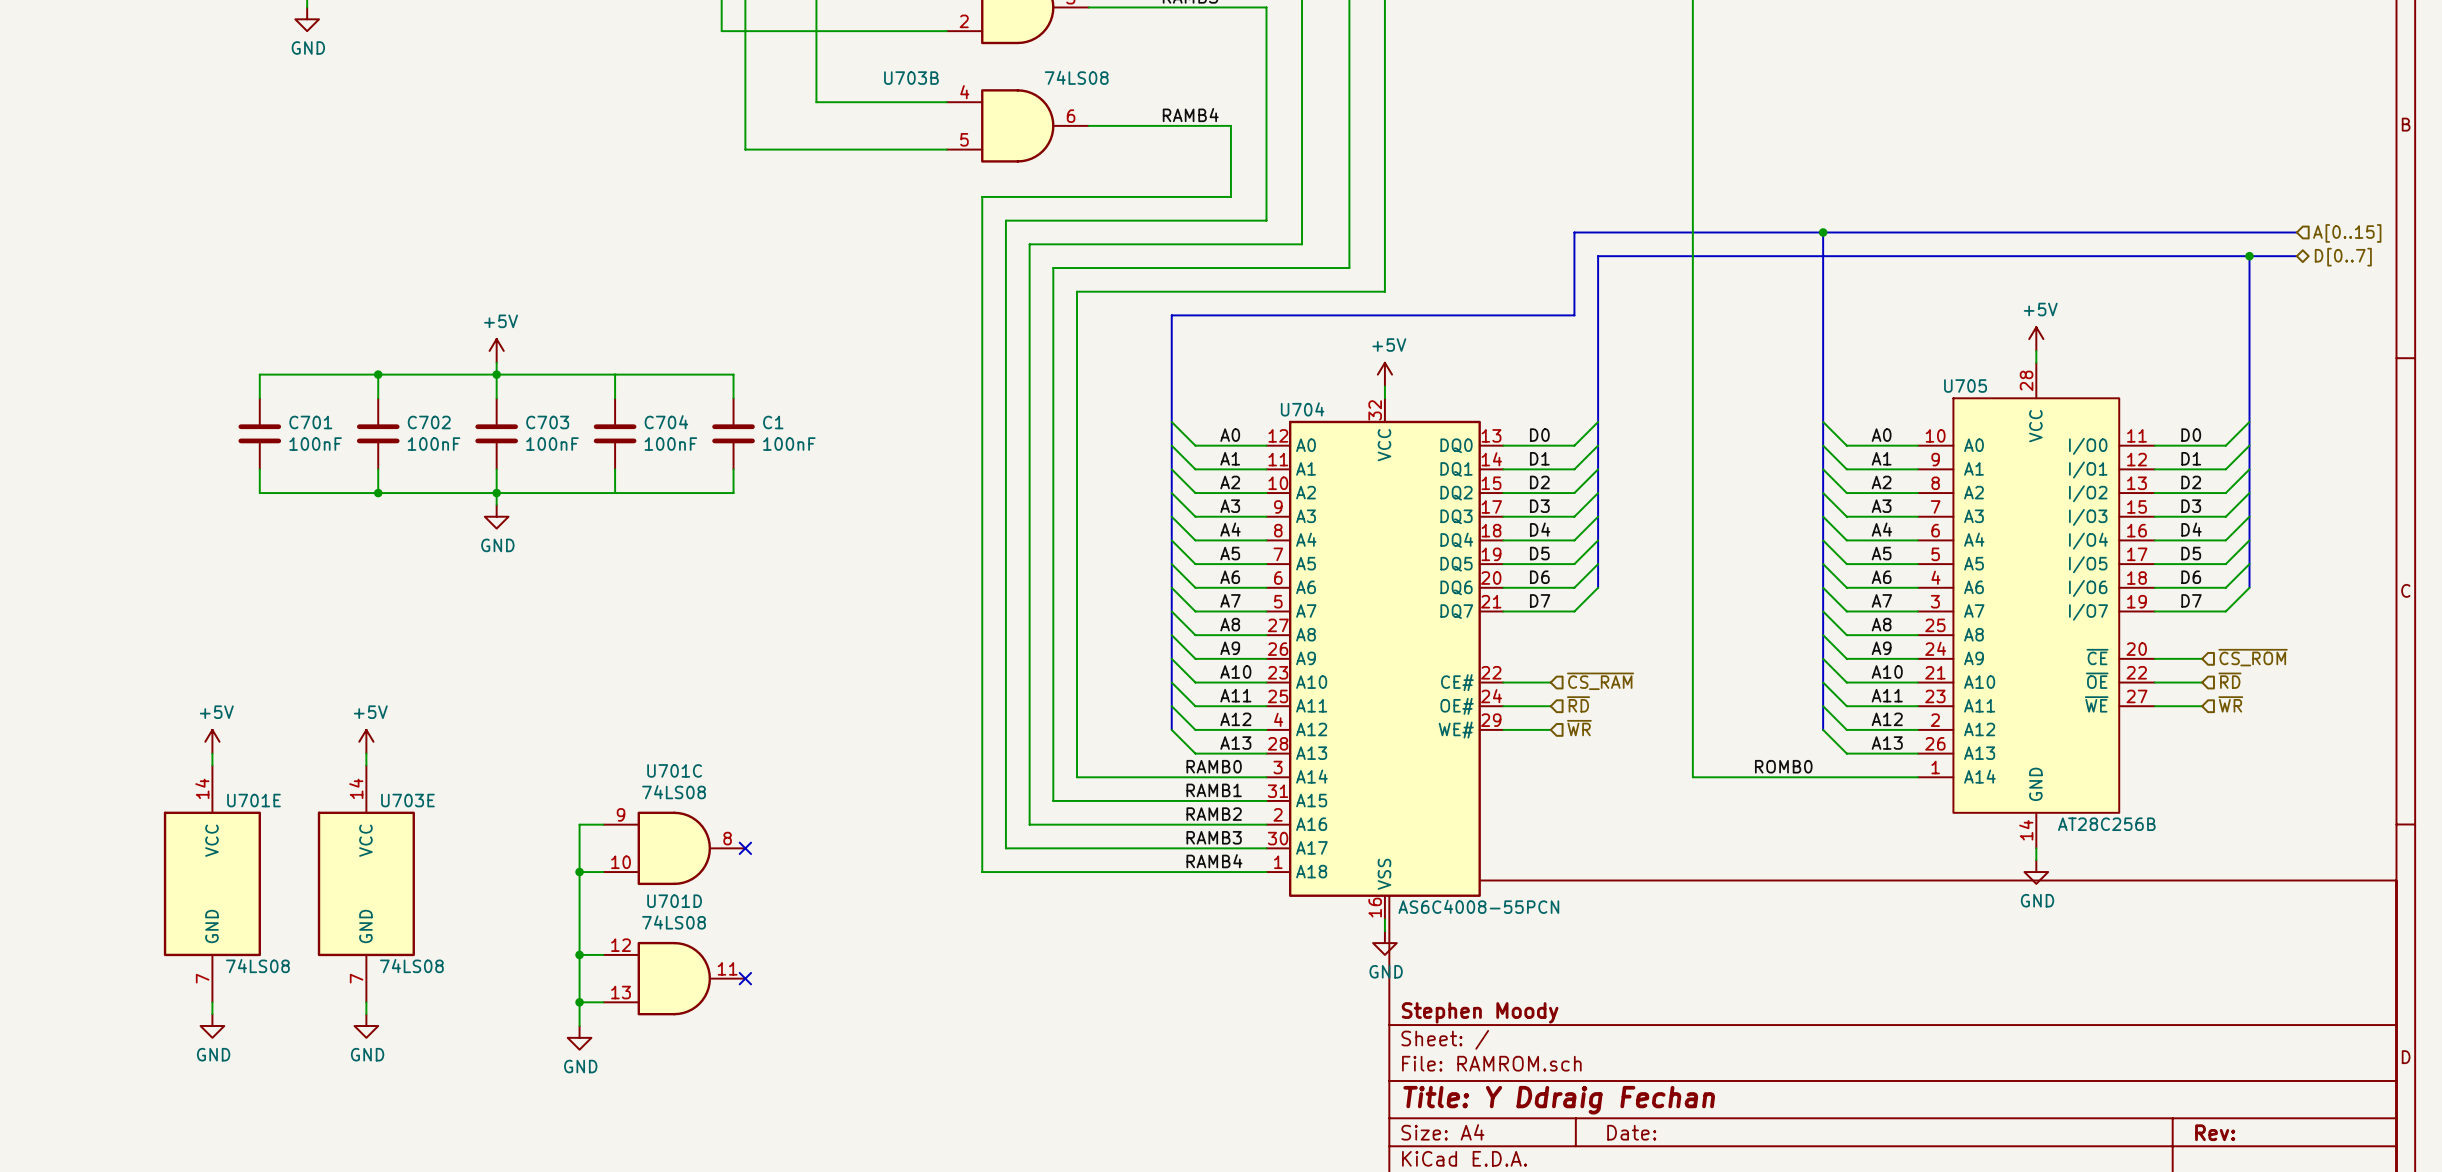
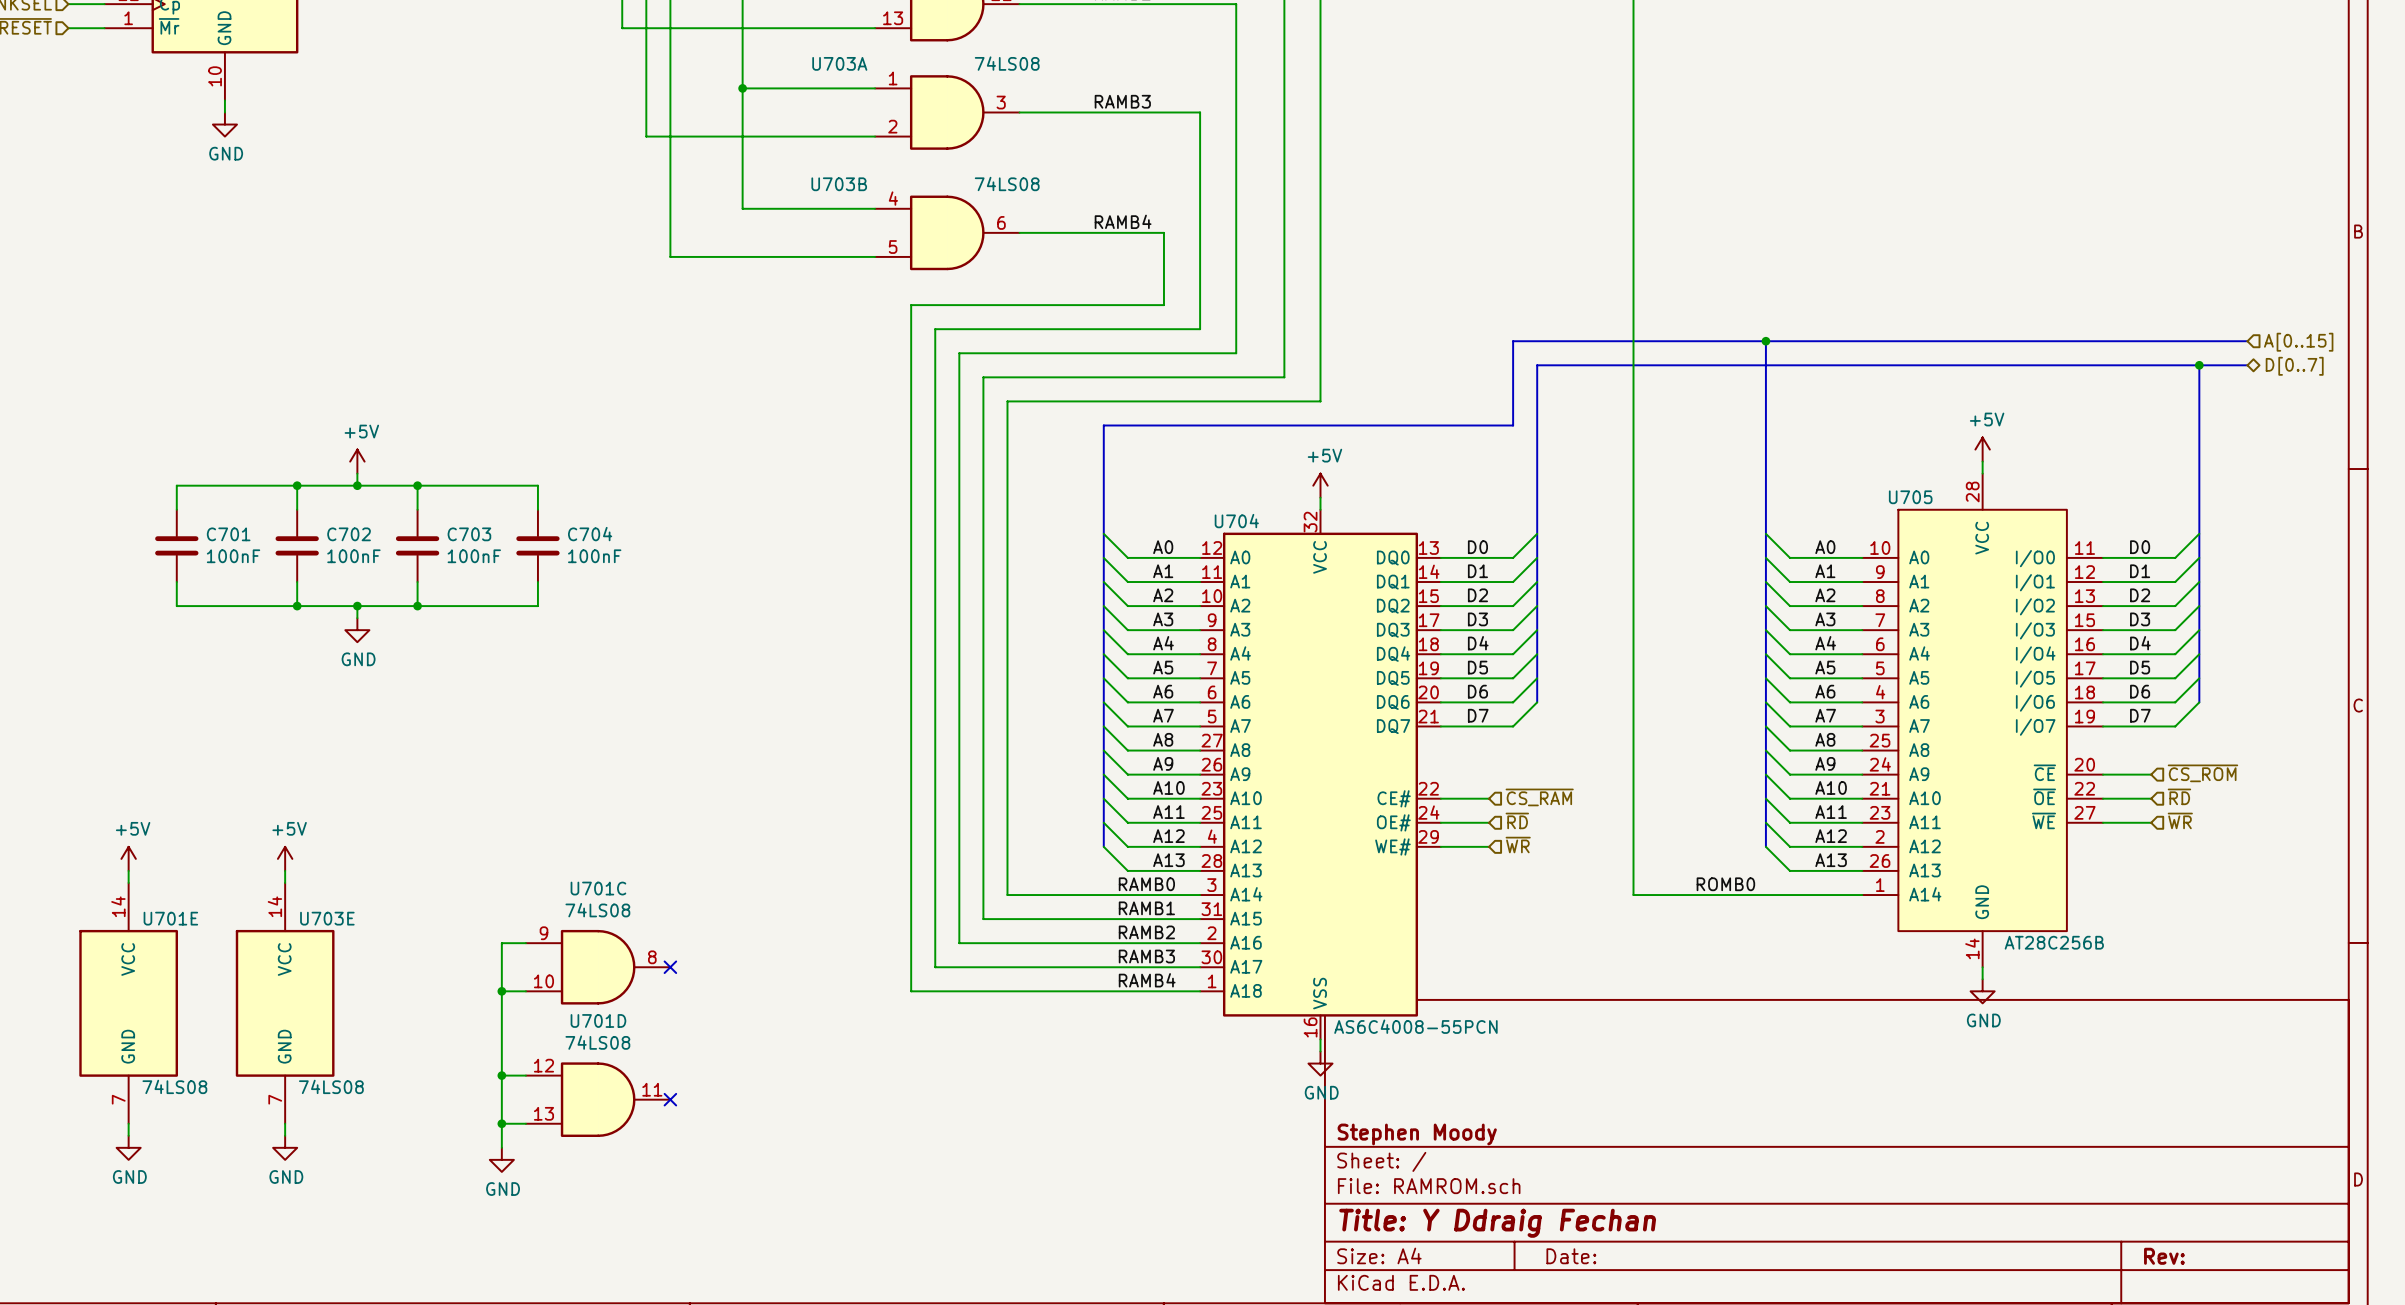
power symbol position: +5V (496, 350) -> +5V (357, 461)
wire: (496, 362) (496, 374) -> (357, 473) (357, 485)
junction: none -> (357, 485)
wire: (615, 374) (733, 374) (733, 398) -> none
C1: 100nF (733, 433) -> none
wire: (733, 469) (733, 493) (615, 493) -> none
junction: none -> (357, 606)
wire: (496, 493) (496, 504) -> (357, 606) (357, 618)
power symbol position: GND (496, 516) -> GND (357, 630)

